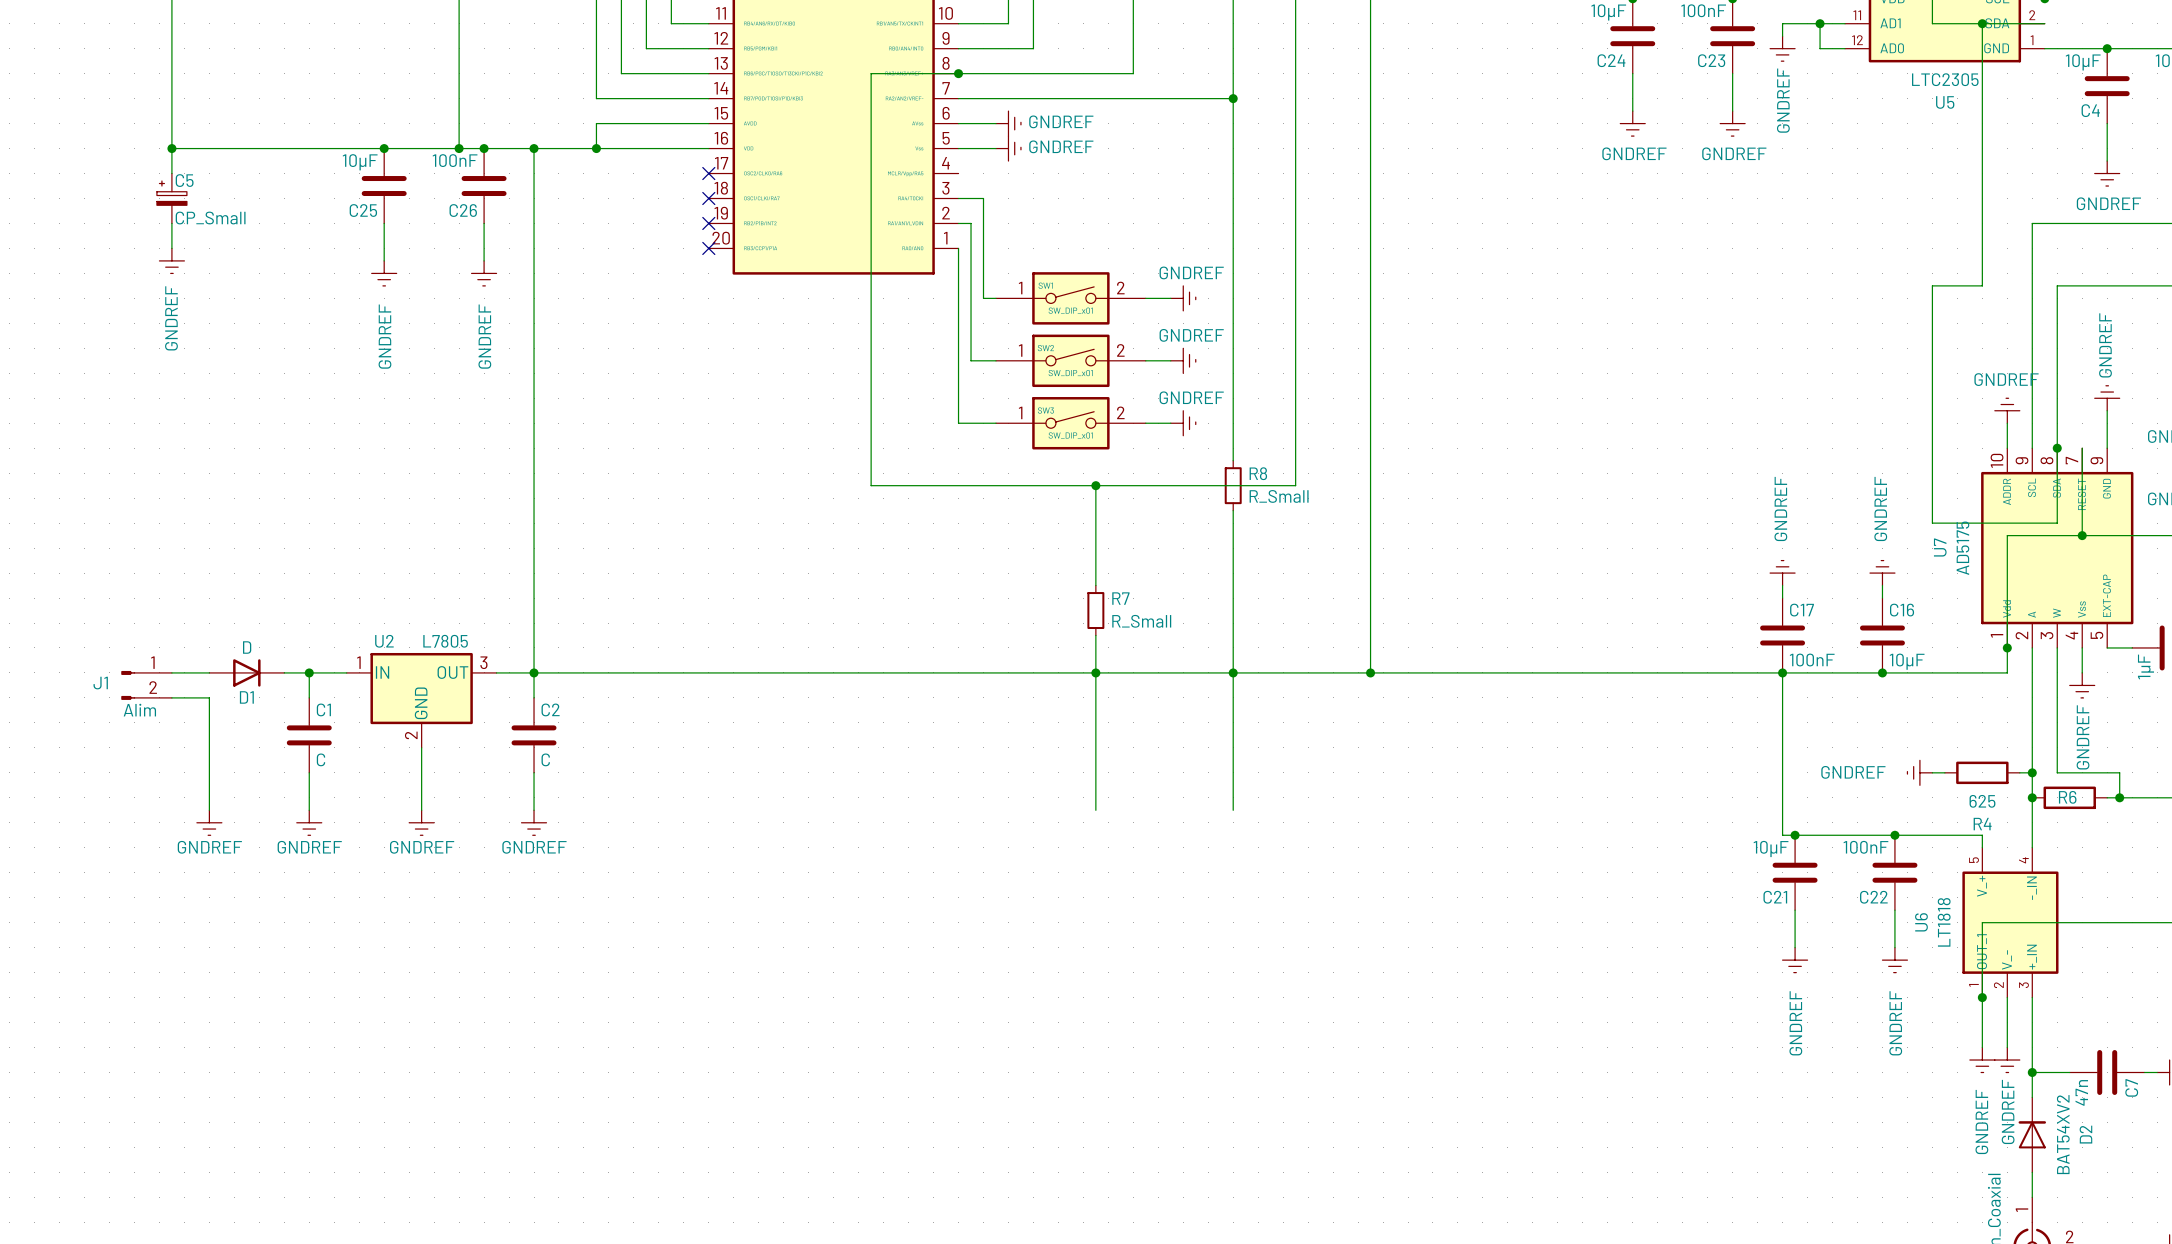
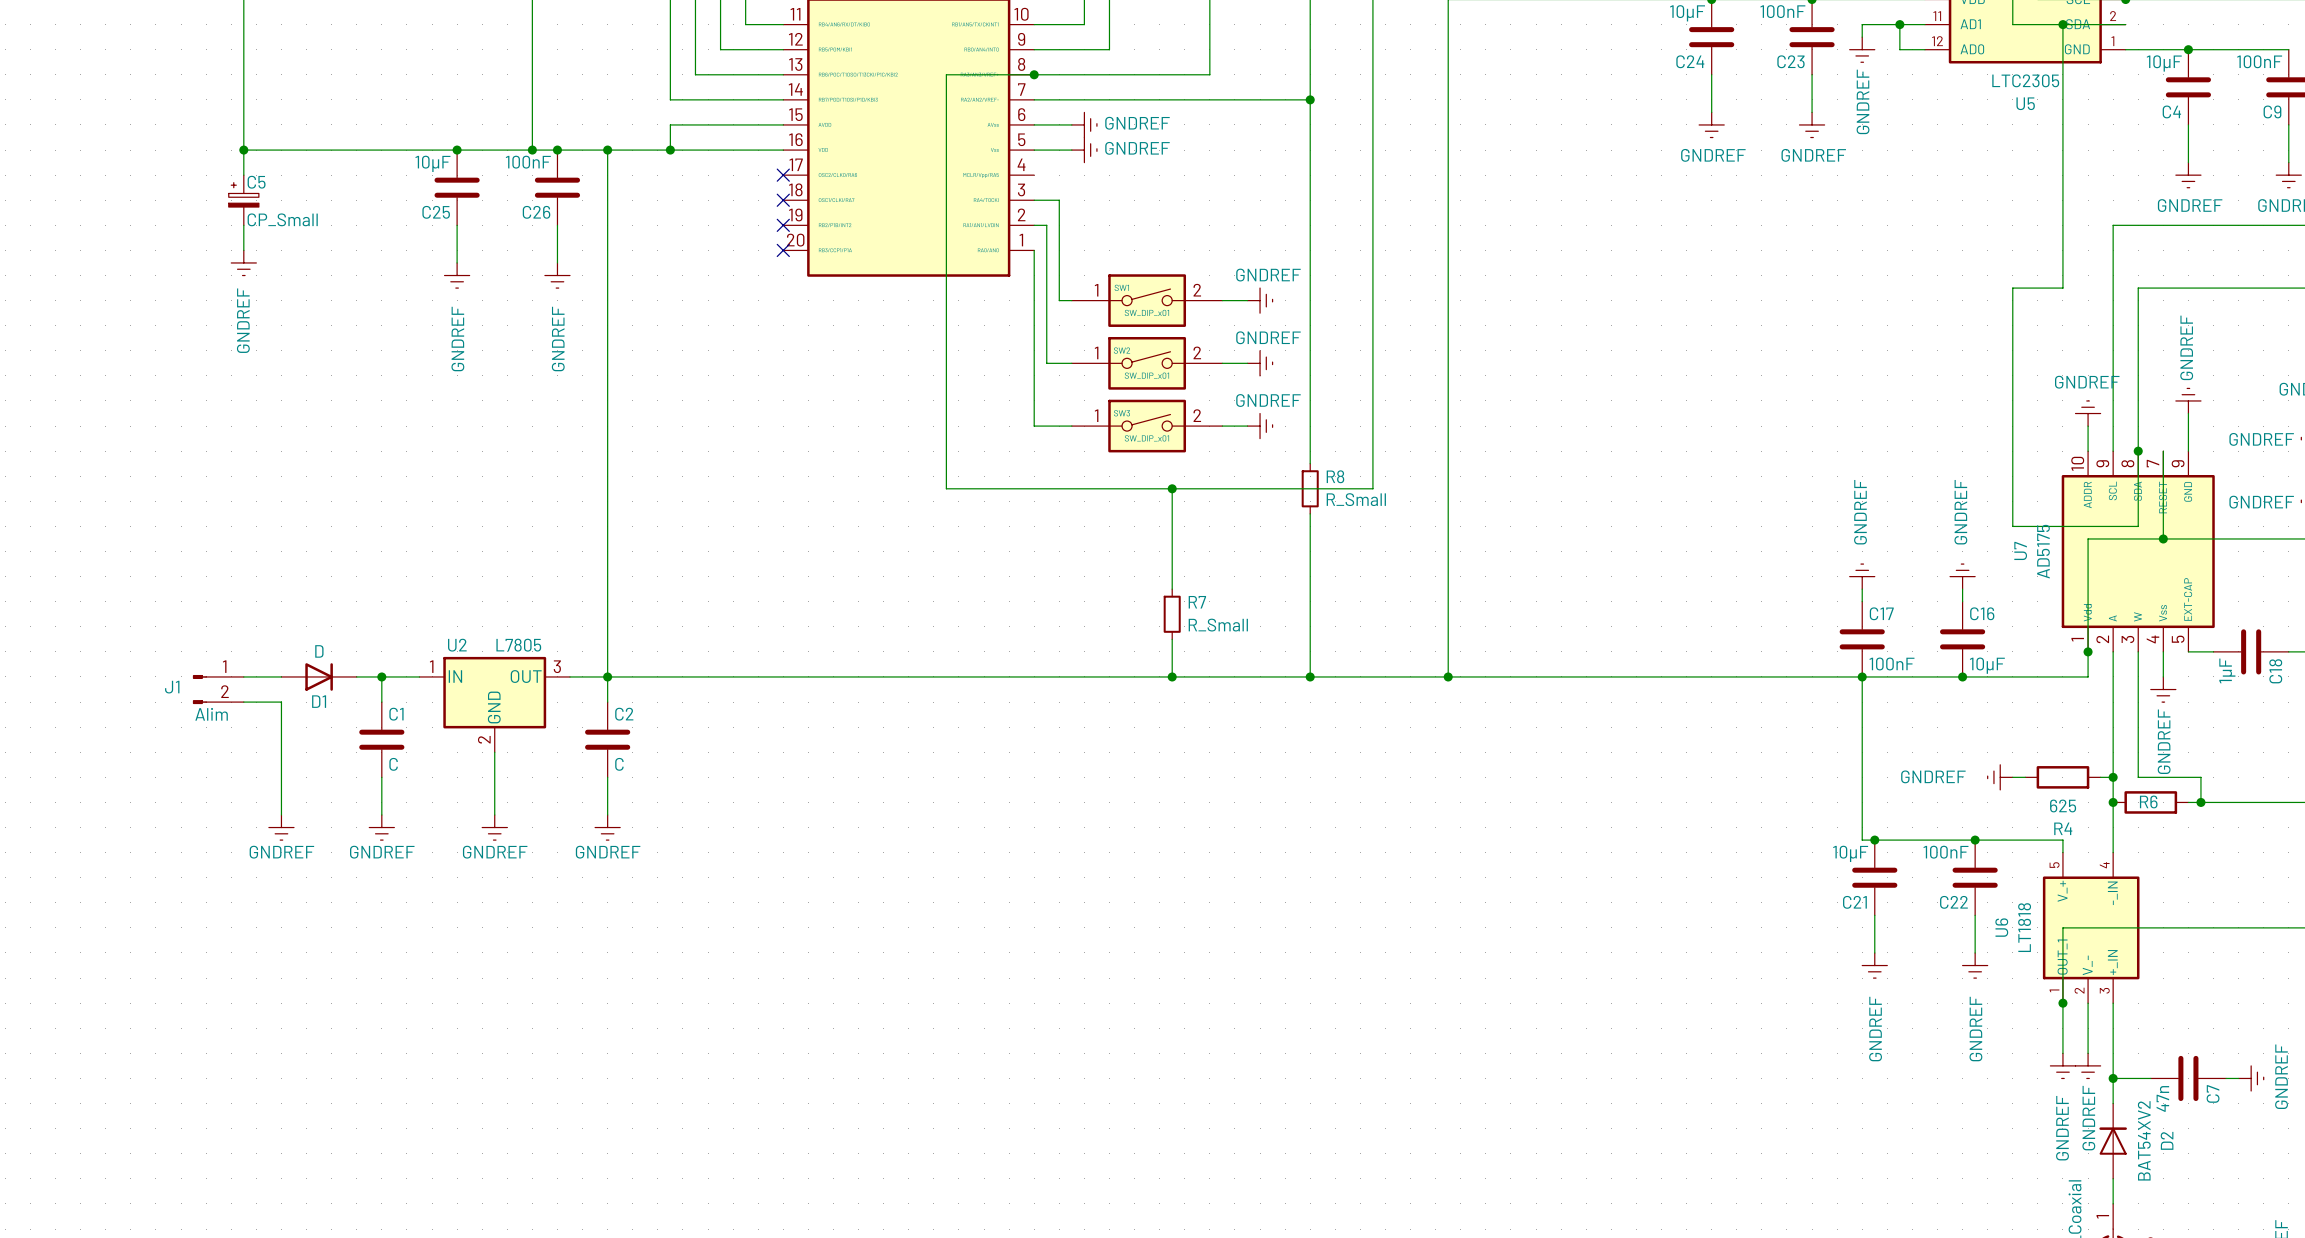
wire: (1095, 672) (1095, 810) -> none
wire: (1233, 672) (1233, 810) -> none

